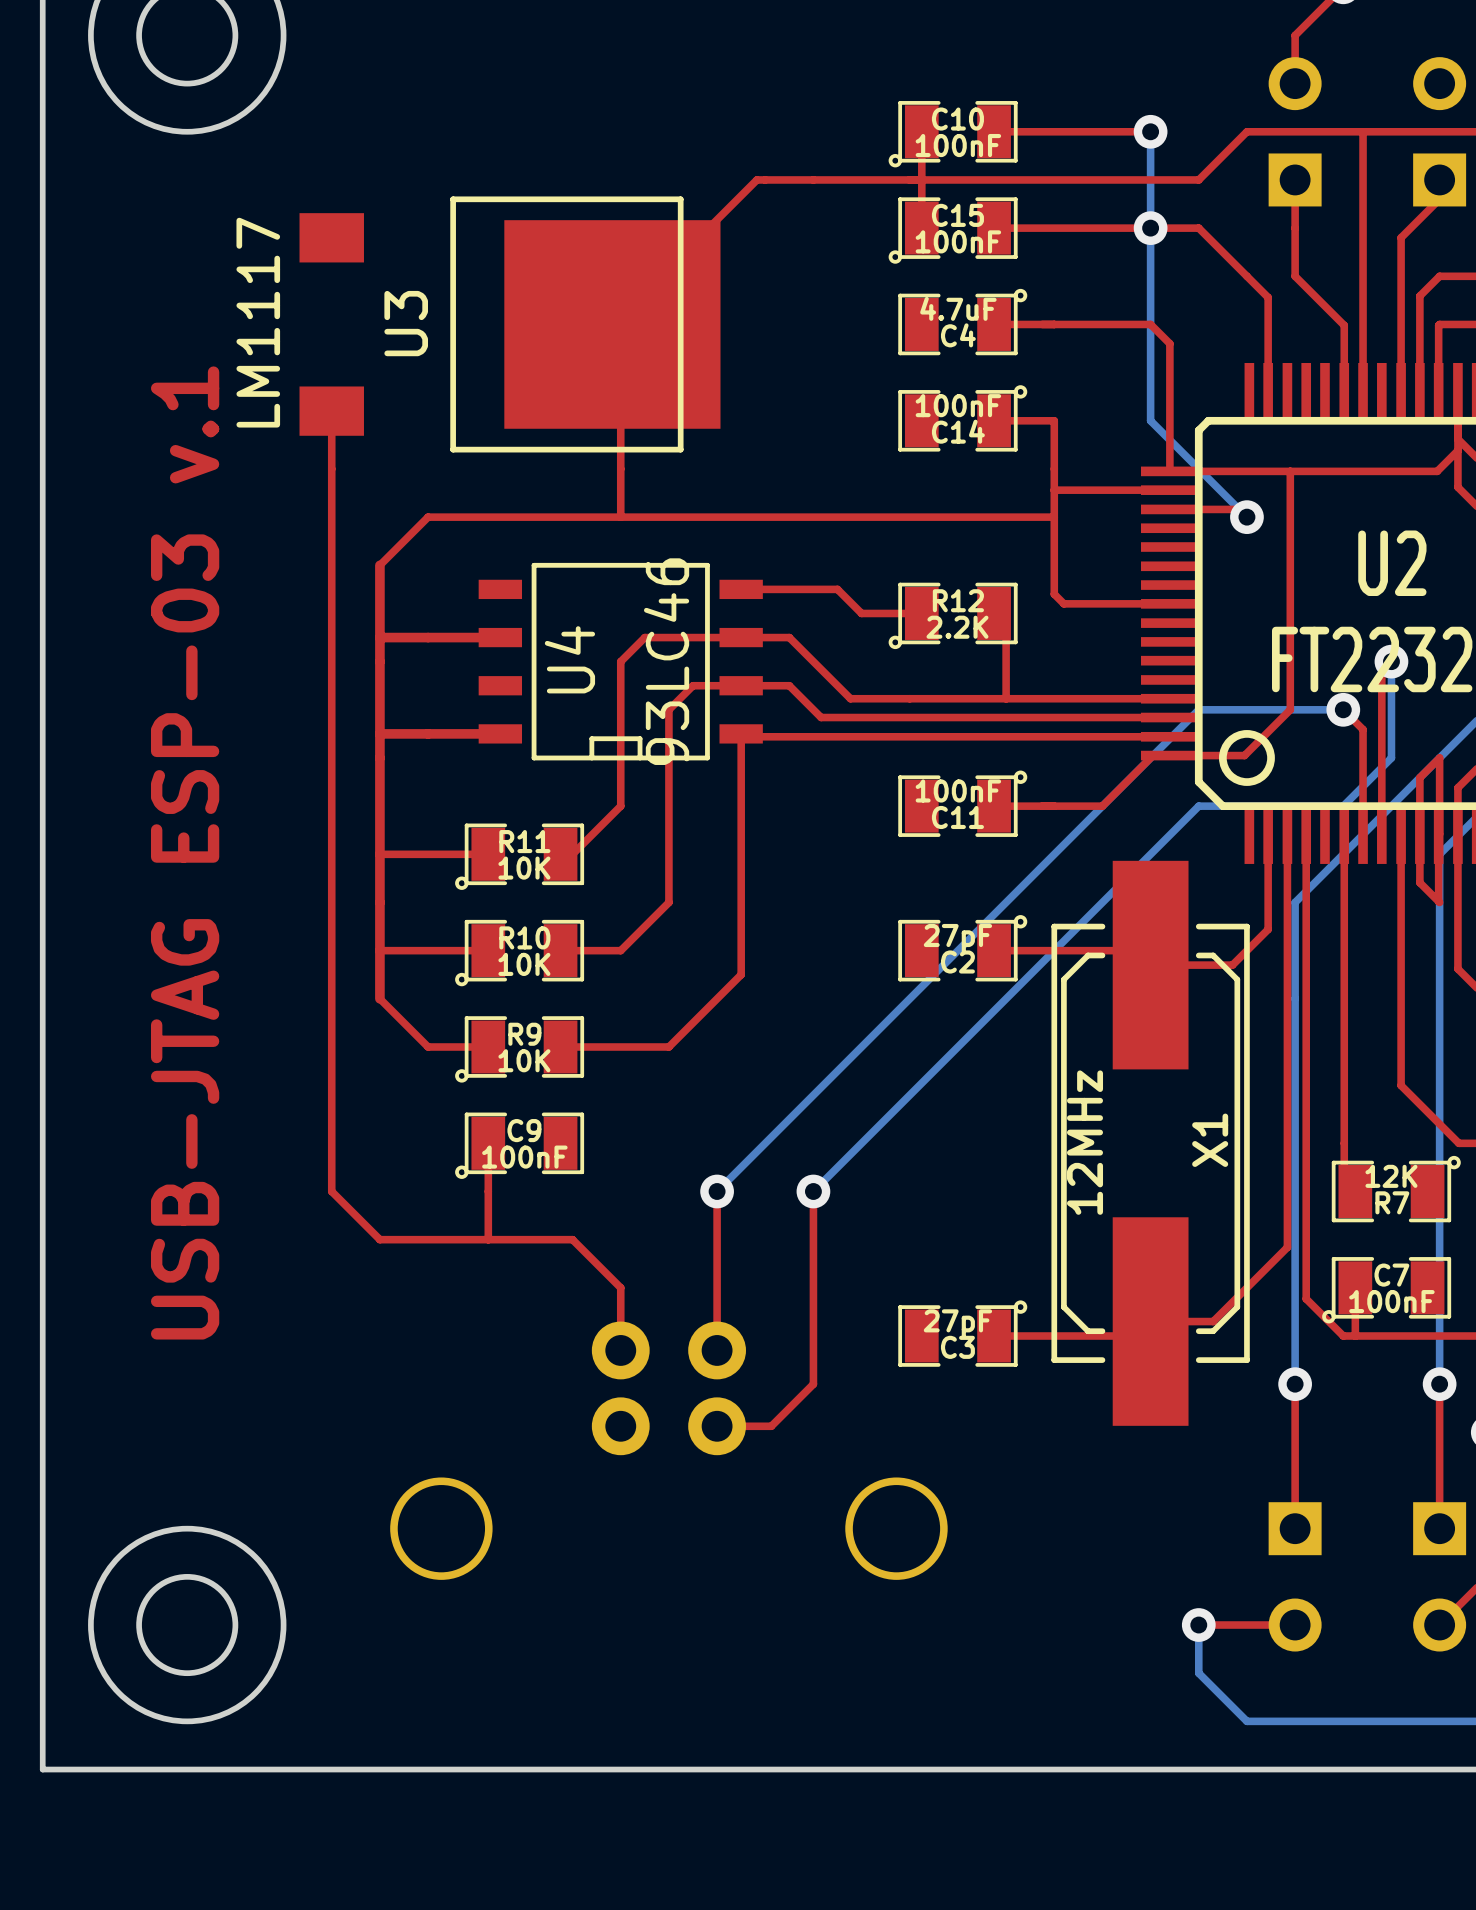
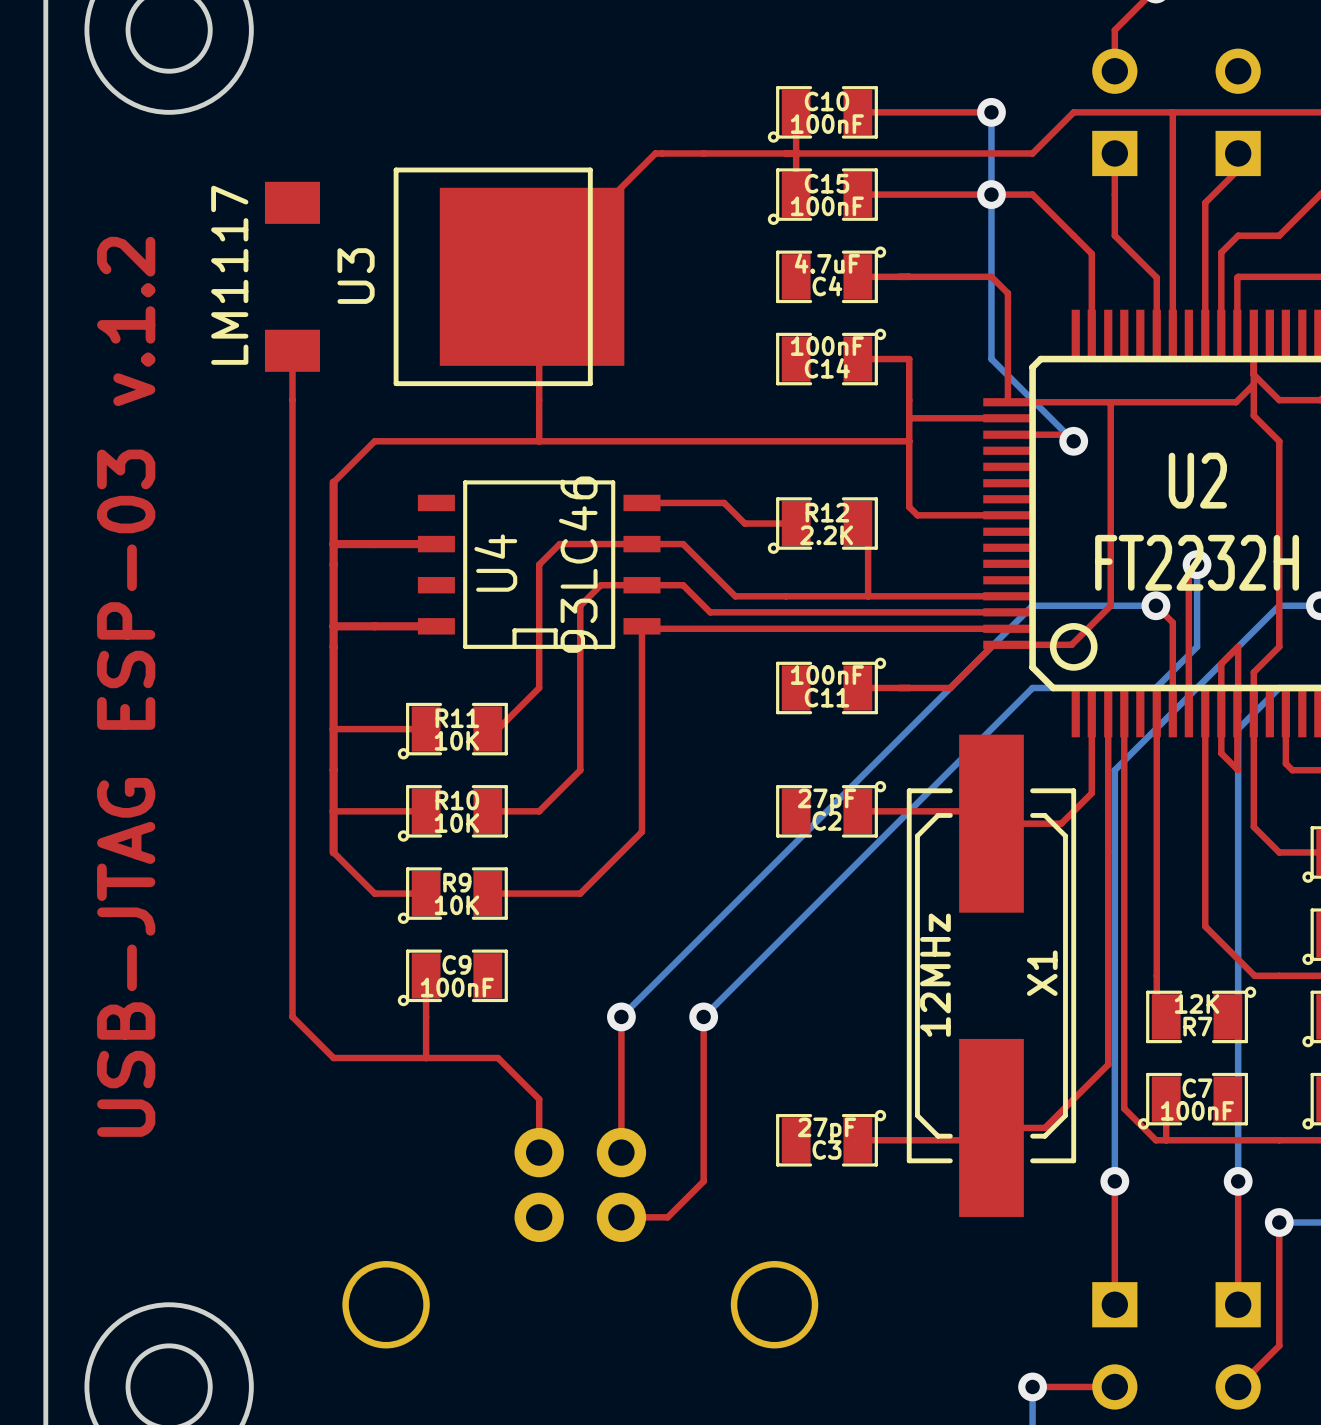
text: USB-JTAG ESP-03 v.1 (185, 852) -> USB-JTAG ESP-03 v.1.2 (126, 686)

